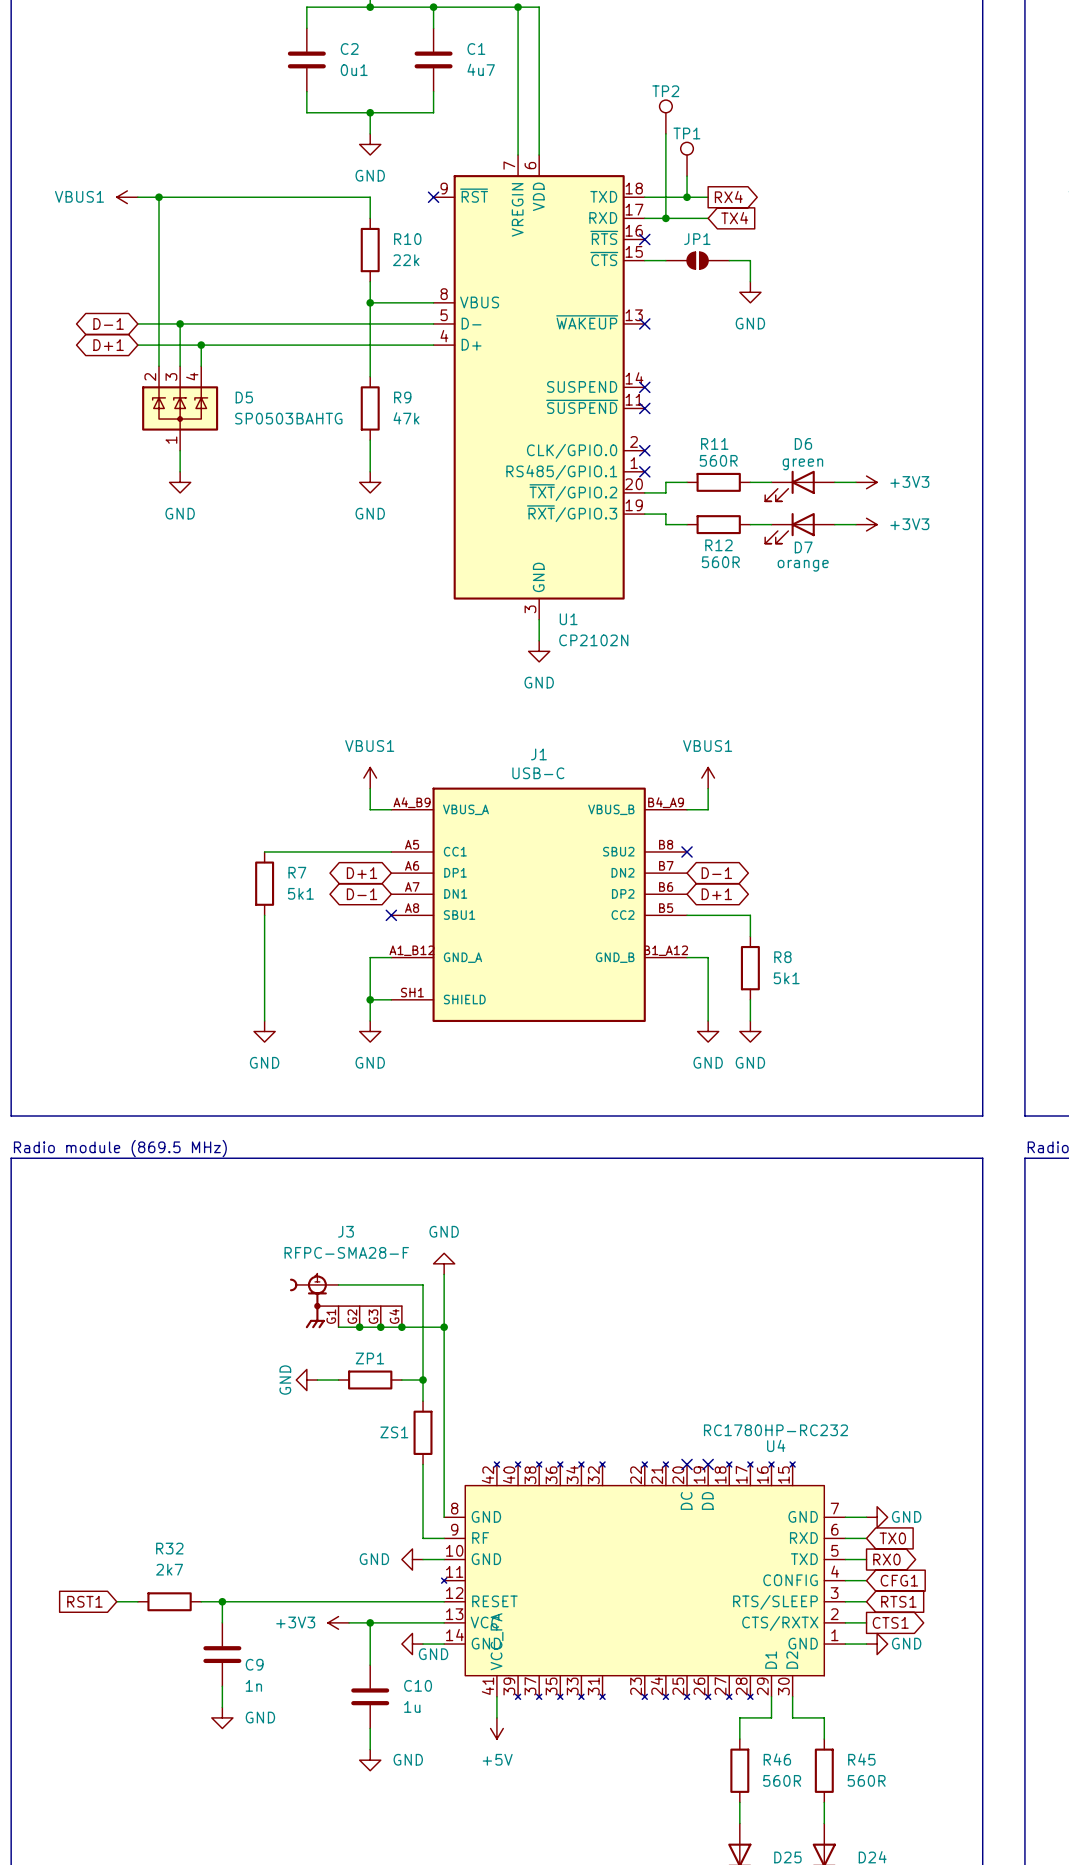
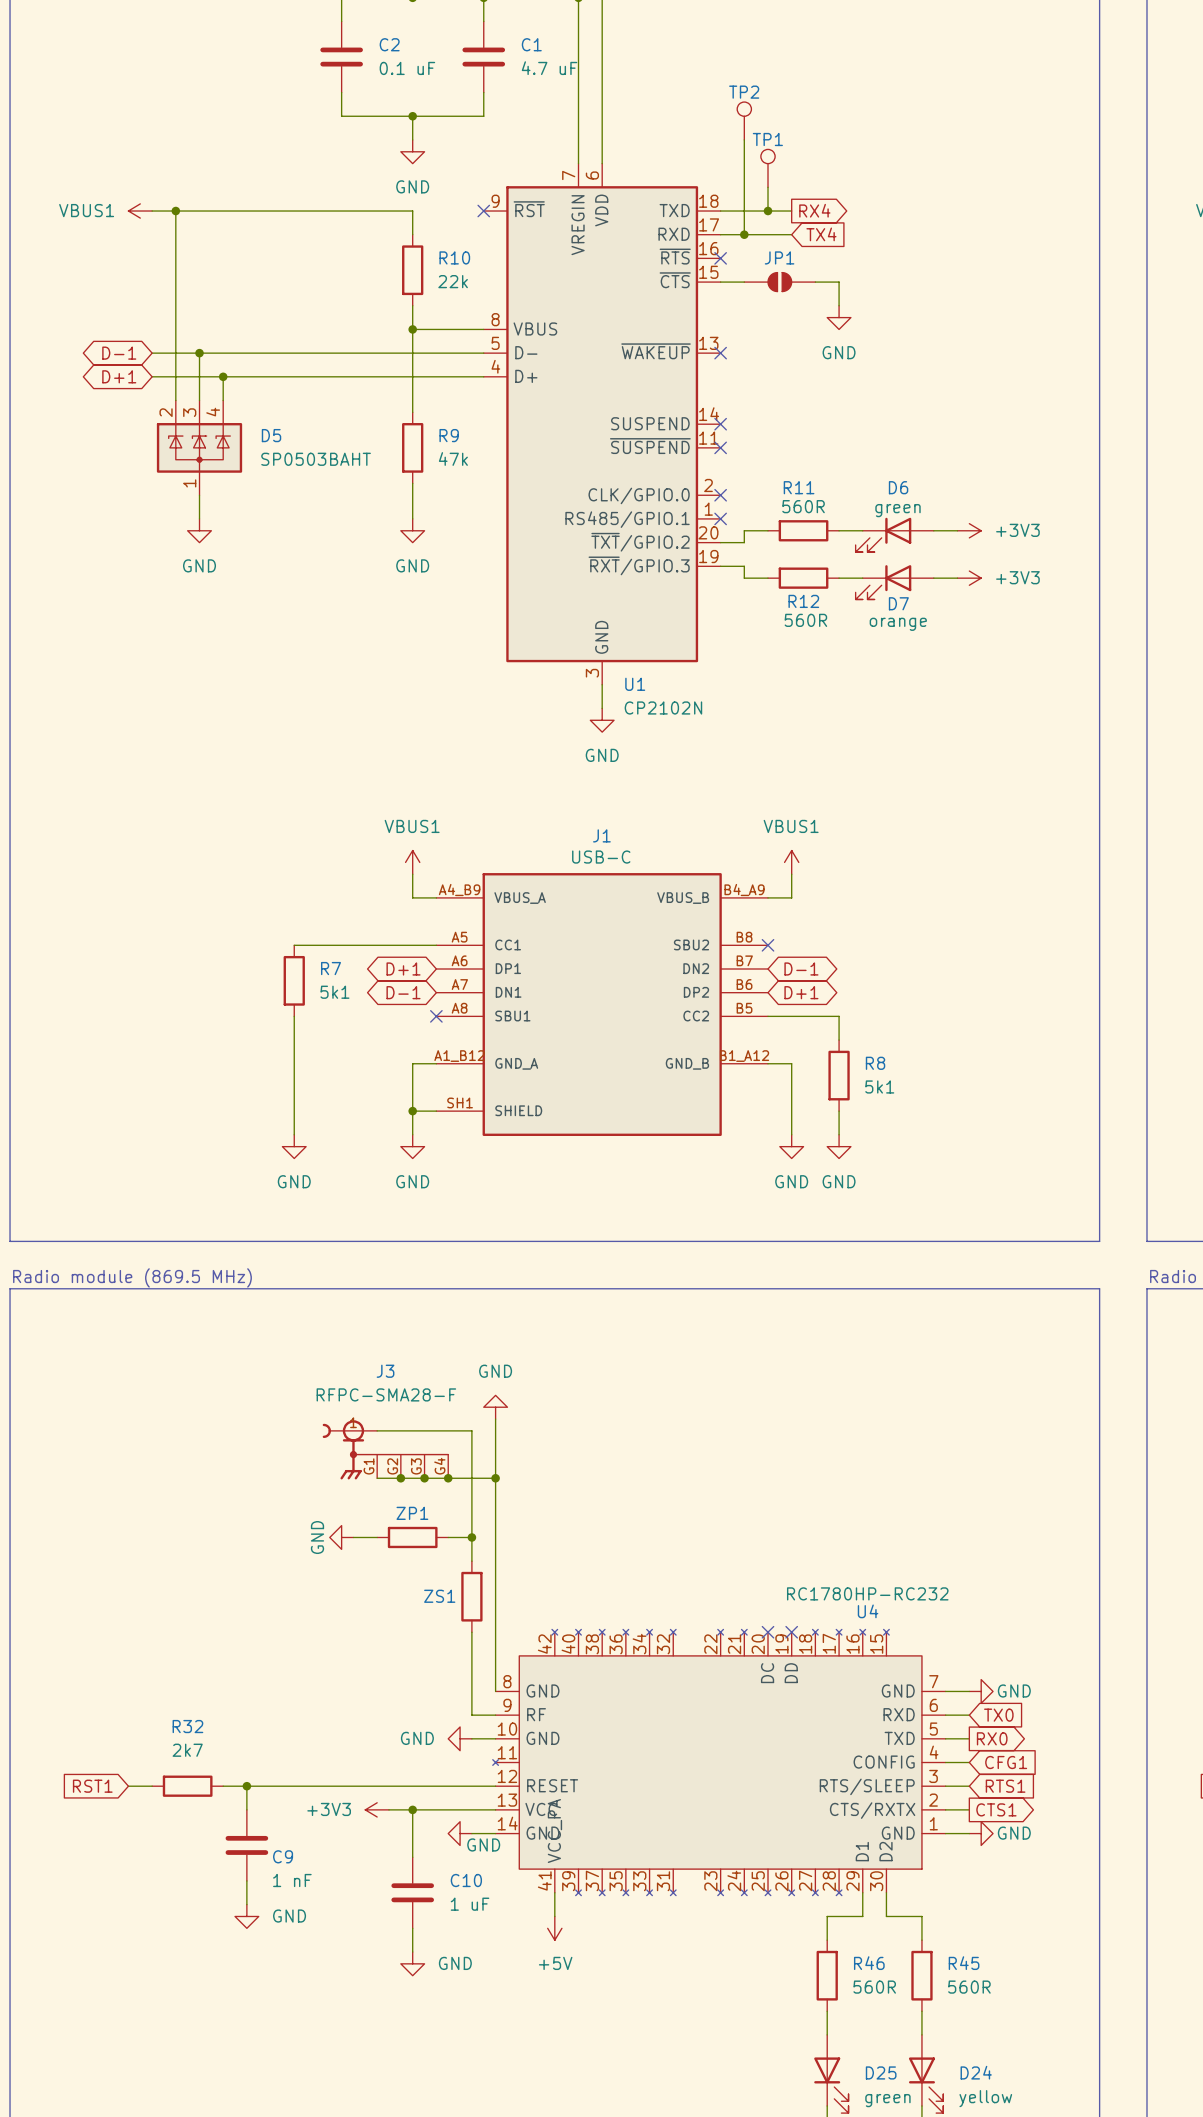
C1 value: 4u7 (481, 69) -> 4.7 uF (549, 68)
C2 value: 0u1 (354, 70) -> 0.1 uF (407, 68)
D5 value: SP0503BAHTG (288, 418) -> SP0503BAHT (316, 459)
C9 value: 1n (253, 1685) -> 1 nF (292, 1880)
C10 value: 1u (412, 1706) -> 1 uF (470, 1904)

